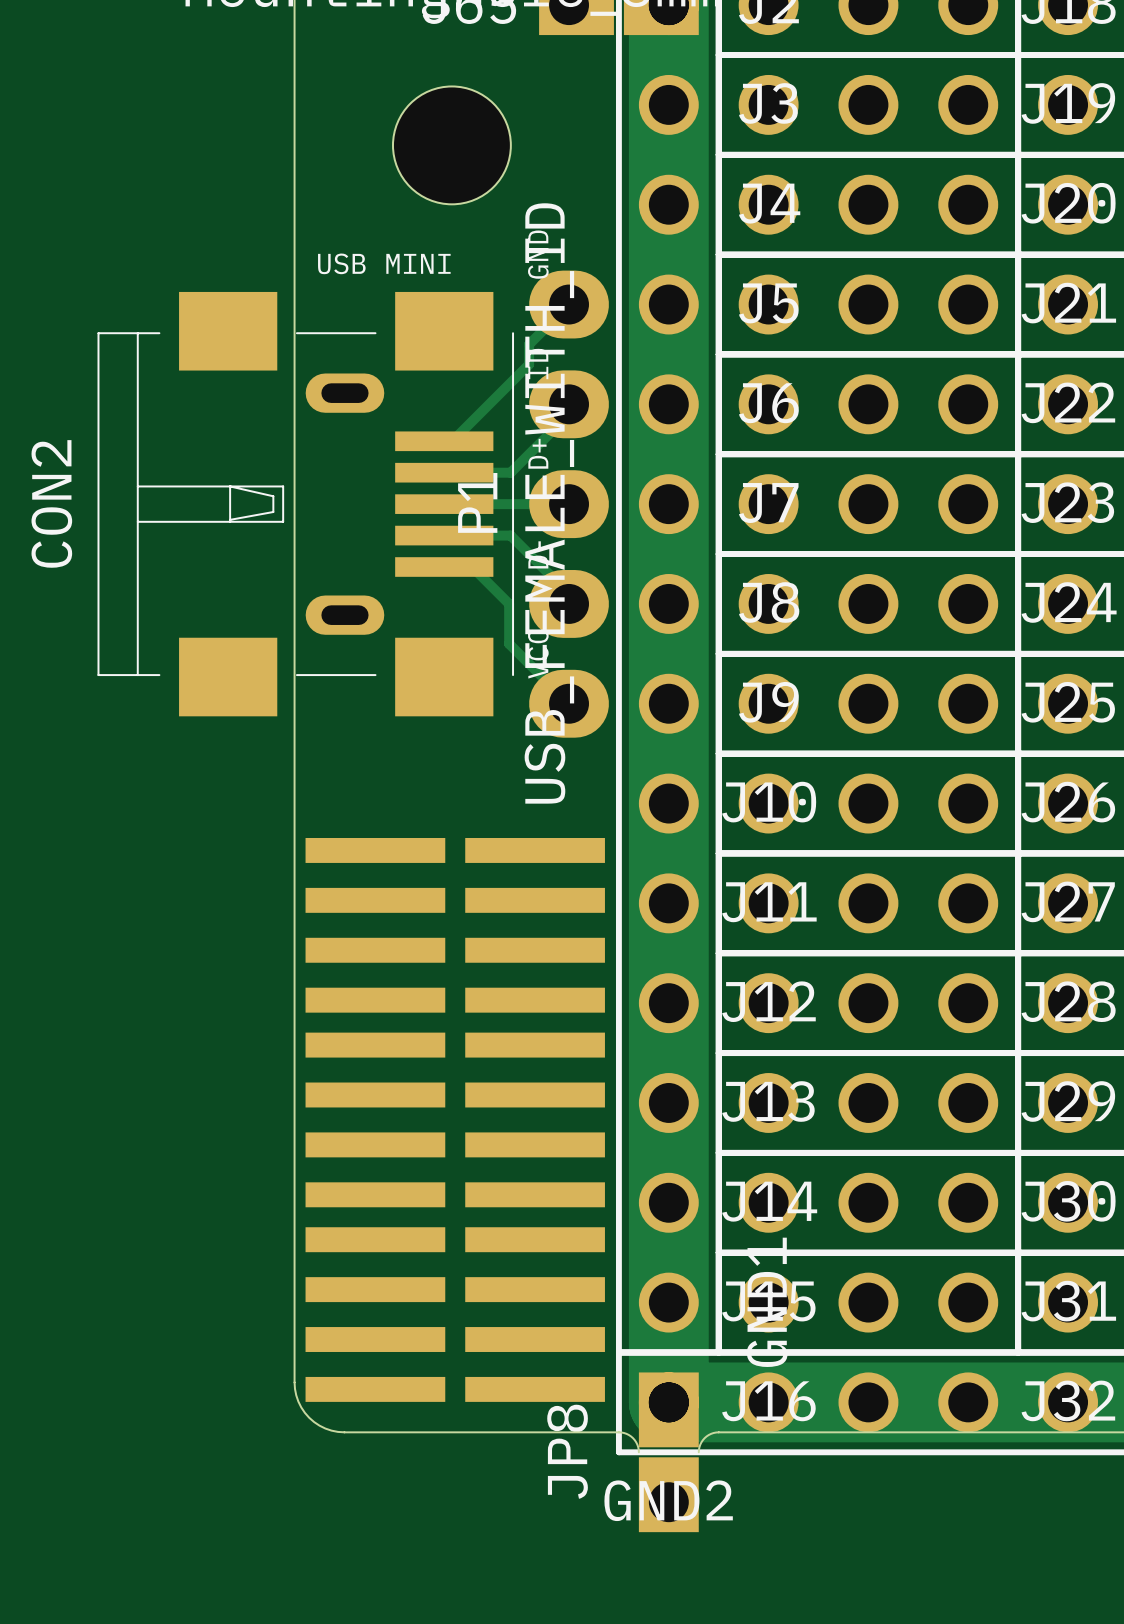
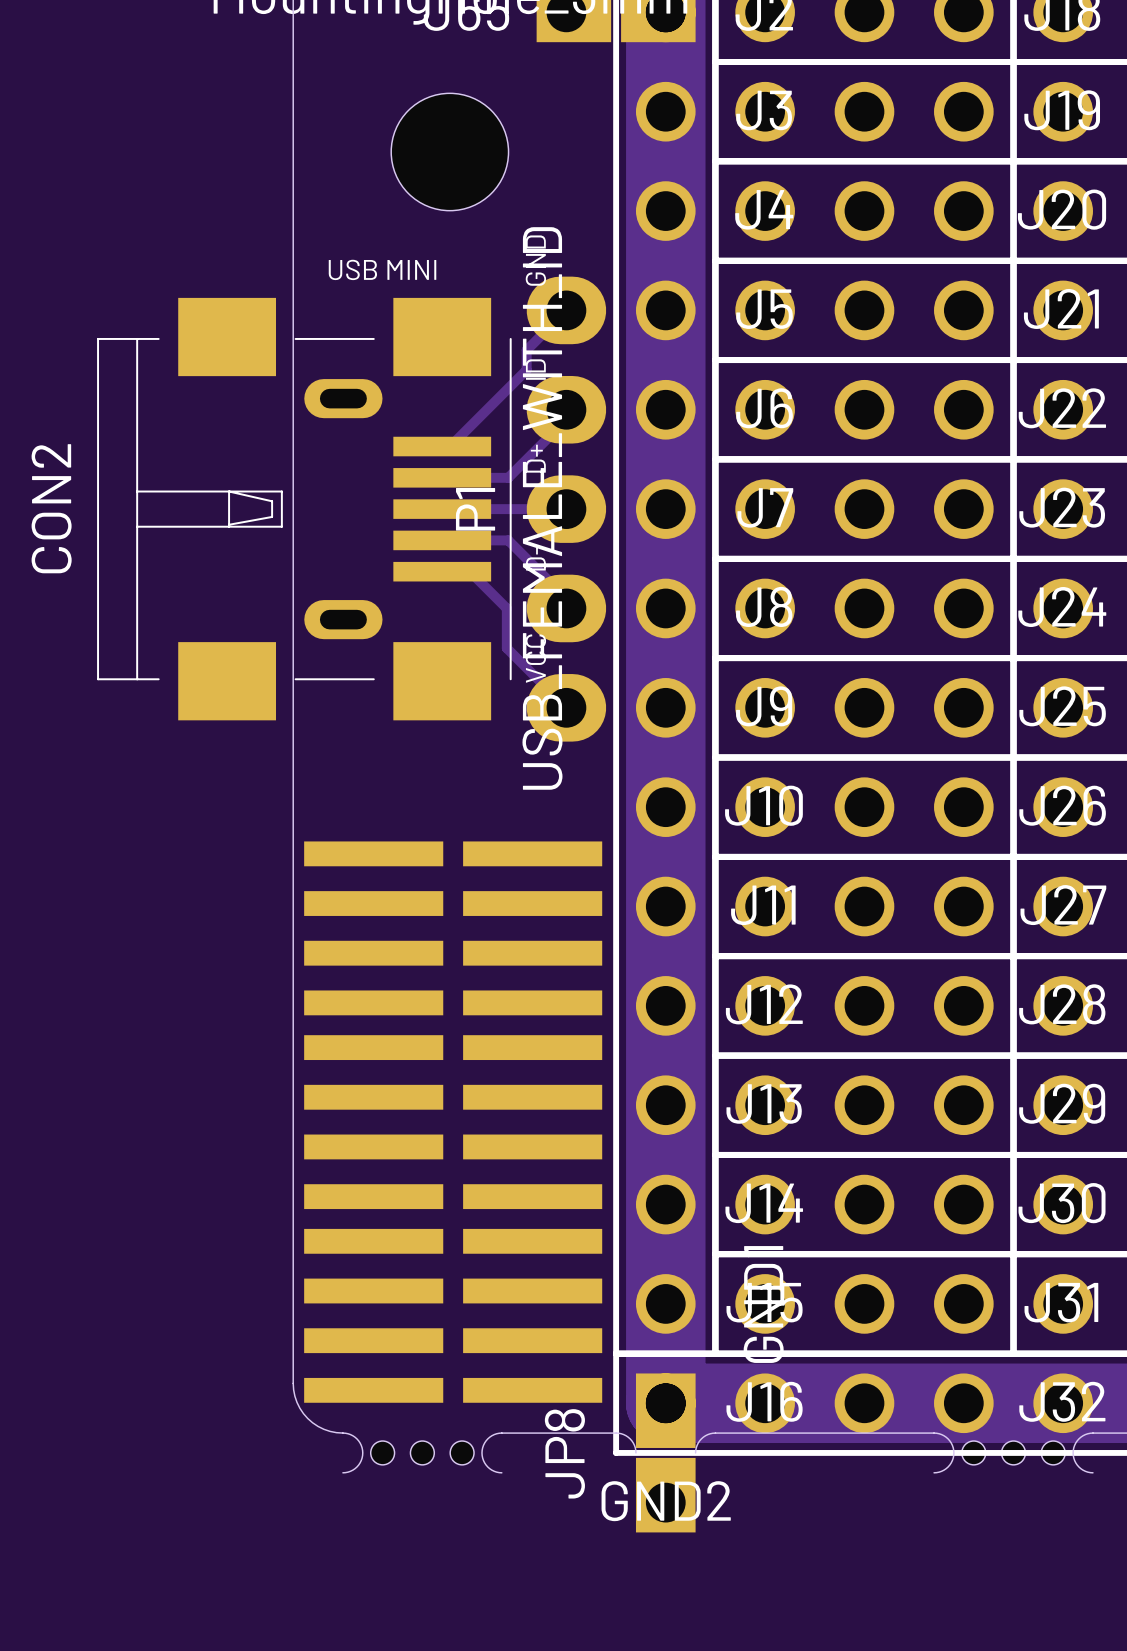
board edge: (344, 1432) (504, 1432) -> none
board edge: (938, 1432) (1098, 1432) -> none
part: none -> (422, 1452)
part: none -> (1013, 1452)

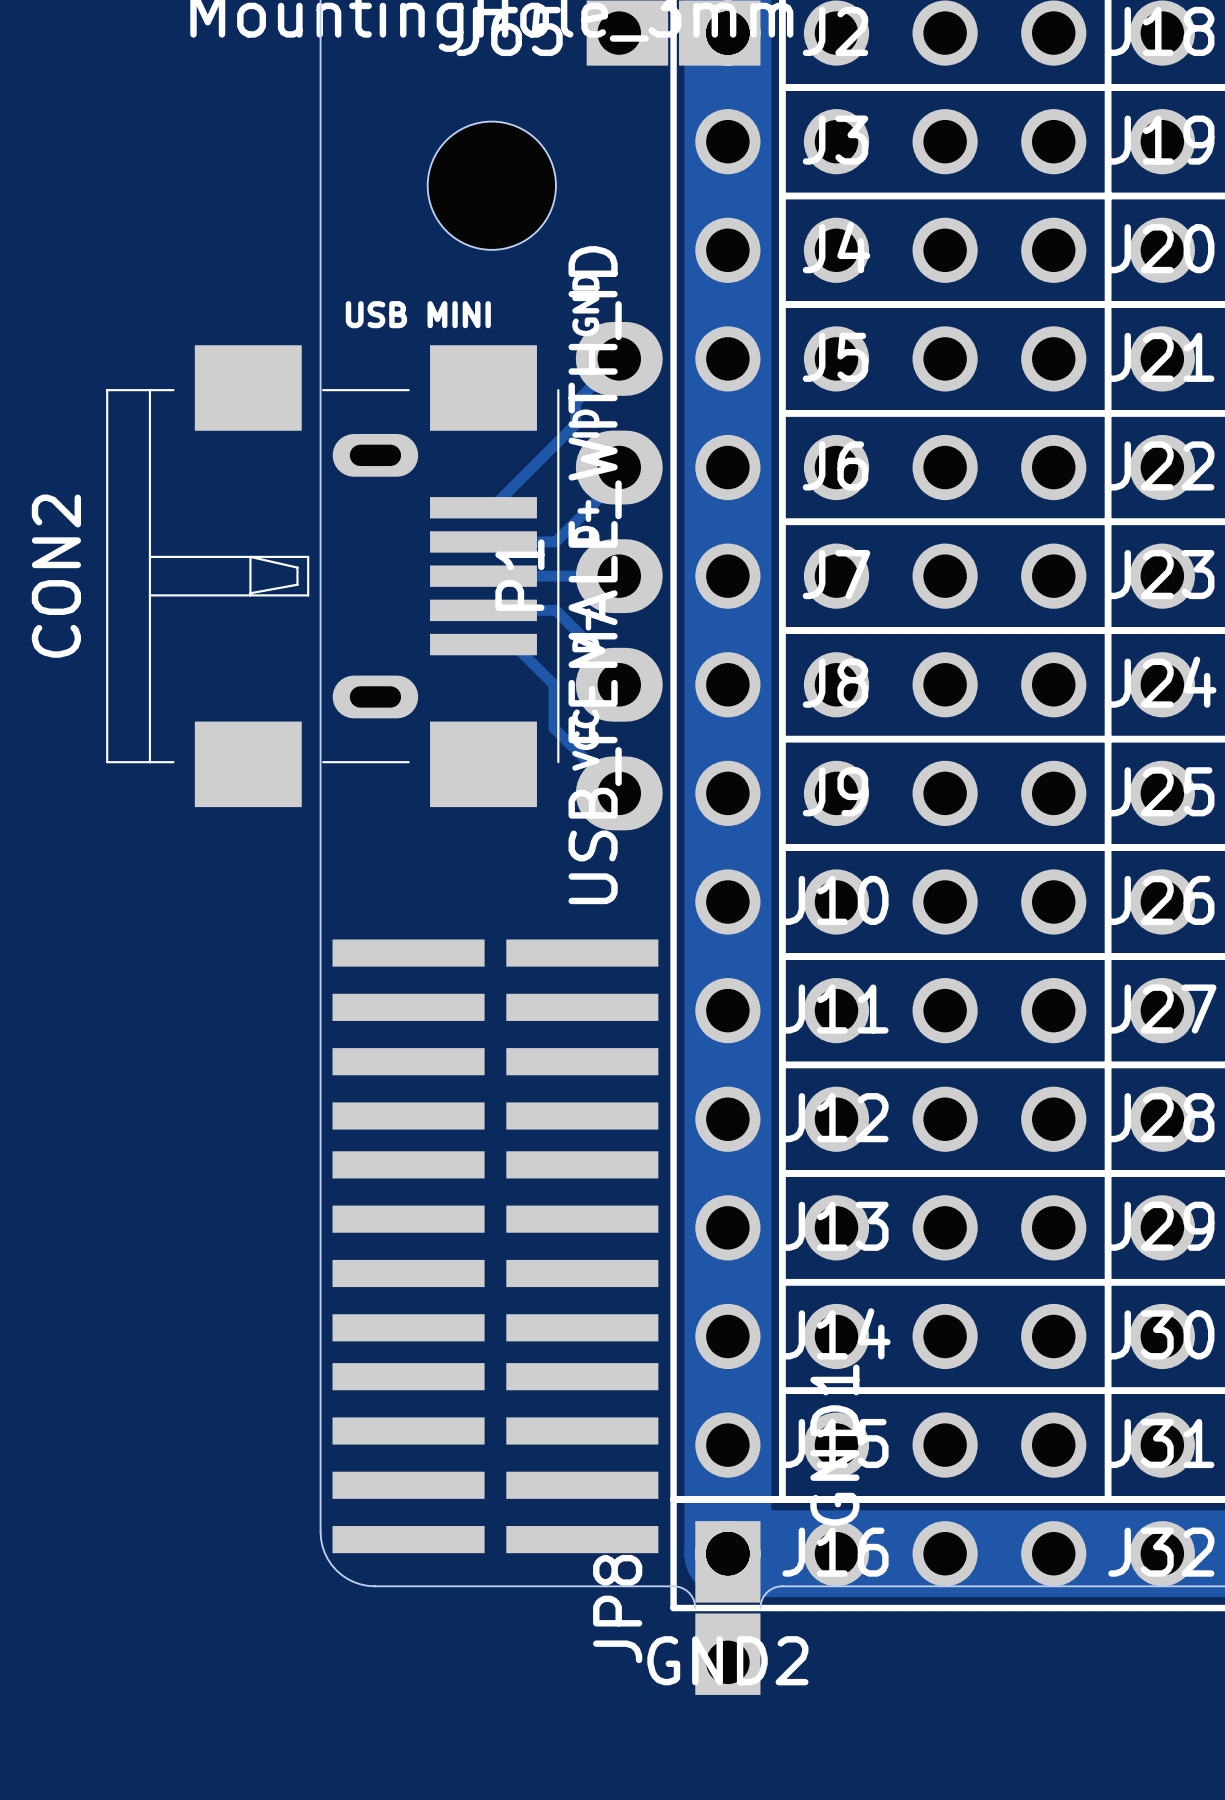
board edge: none -> (374, 1586) (548, 1586)
board edge: none -> (1021, 1586) (1194, 1586)
part: (422, 1452) -> none
part: (1013, 1452) -> none

